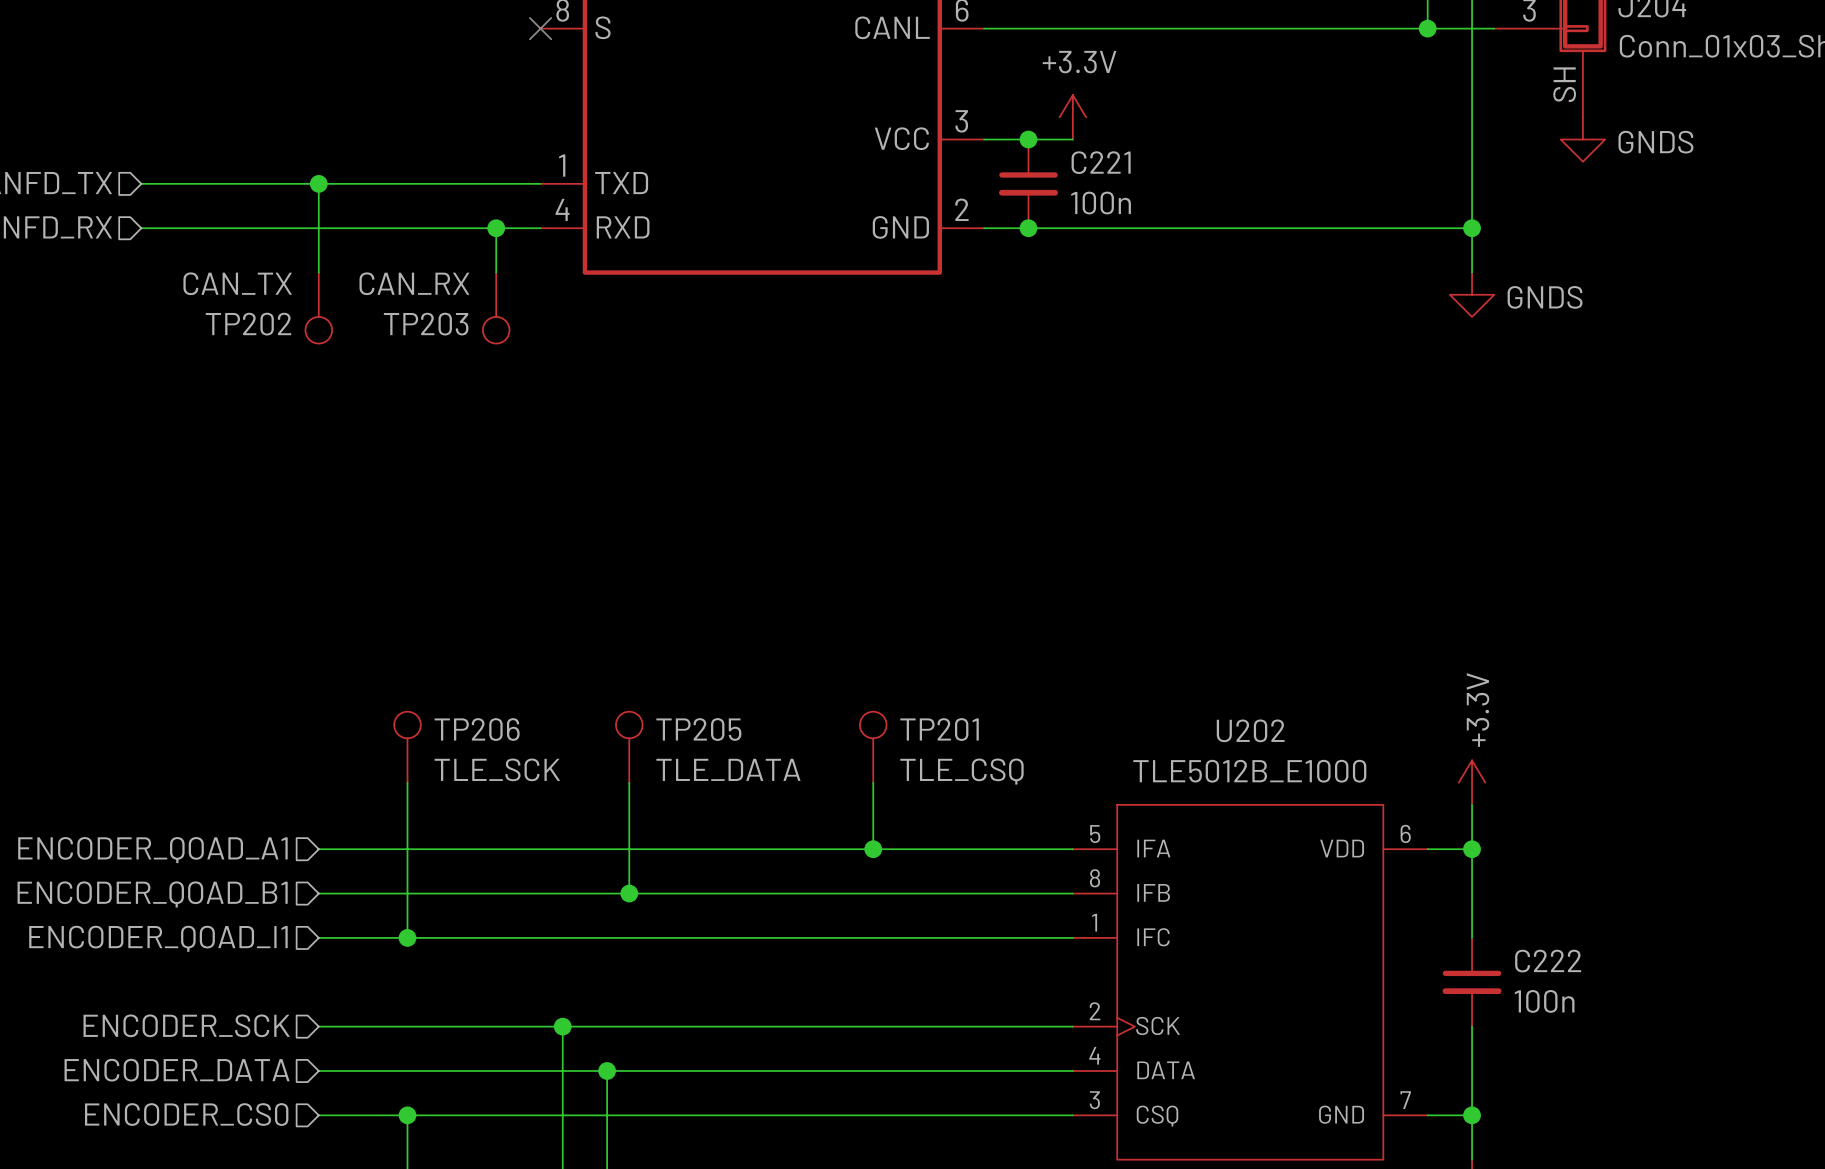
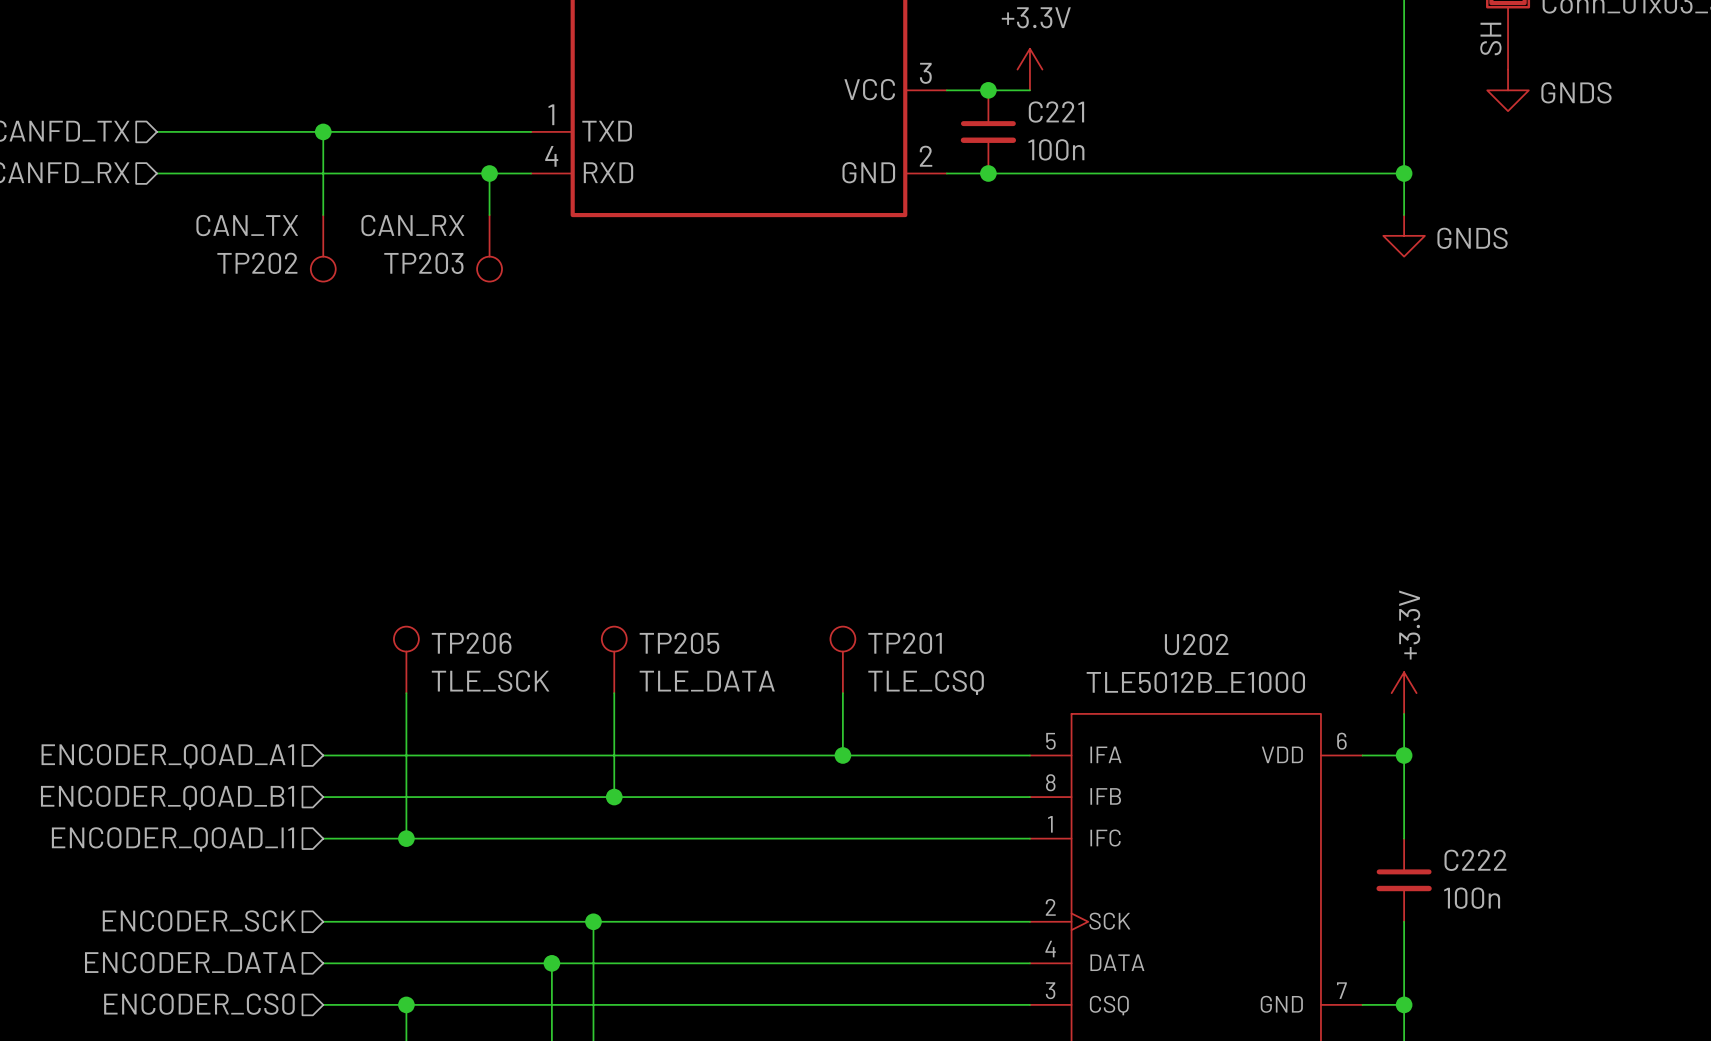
wire: (562, 1026) (562, 1070) -> (593, 921) (593, 963)
junction: (562, 1026) -> none
junction: none -> (593, 921)
junction: none -> (551, 963)
junction: (607, 1070) -> none

